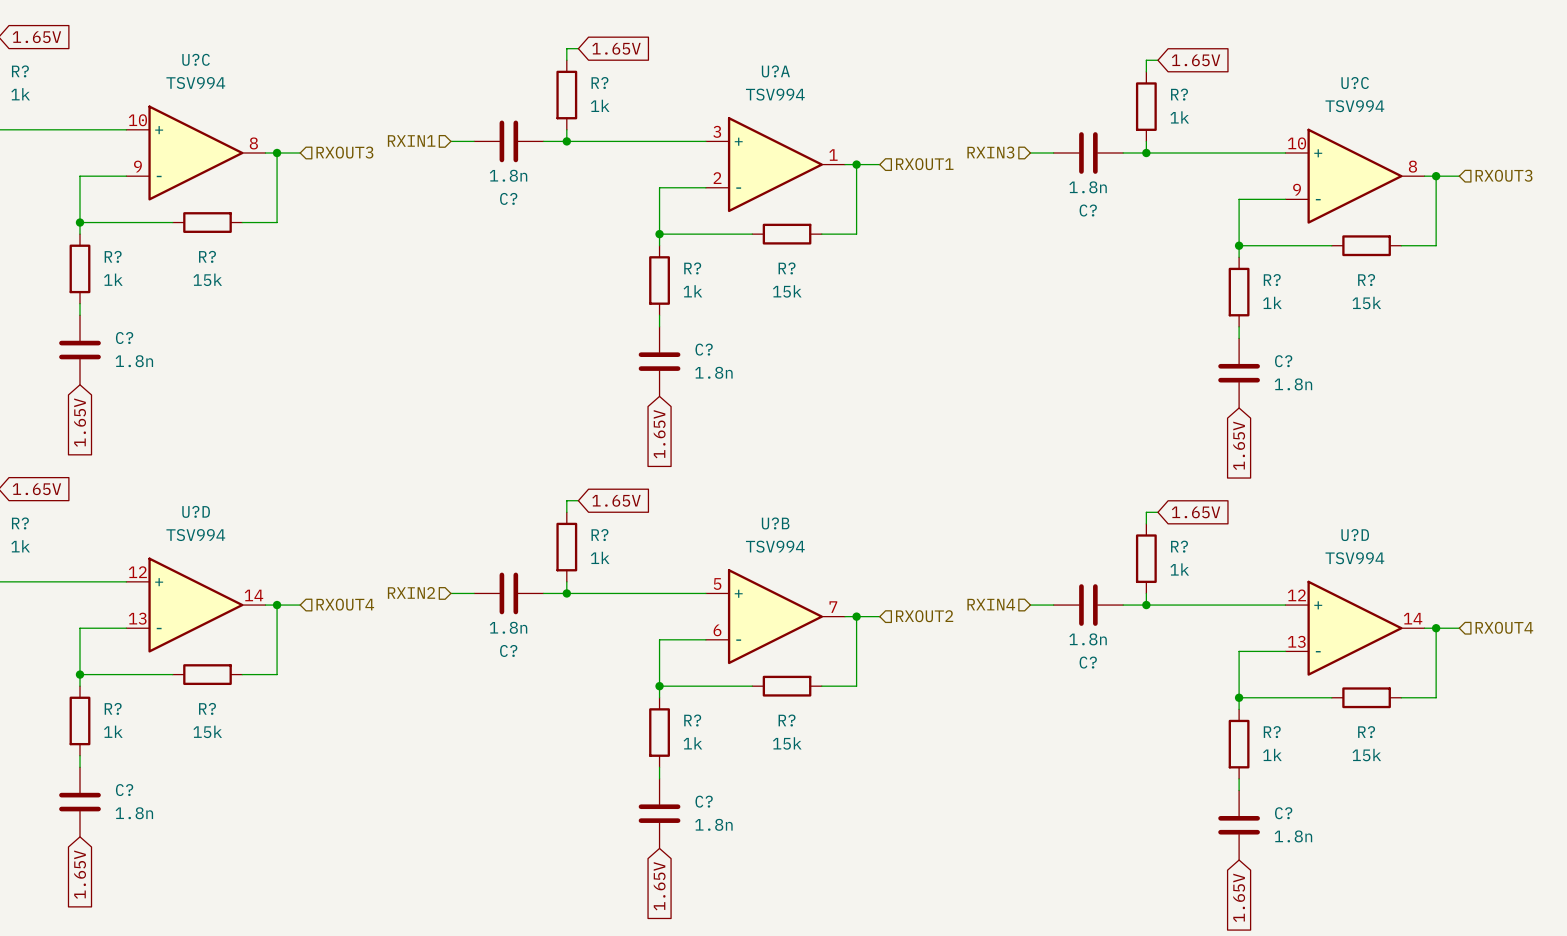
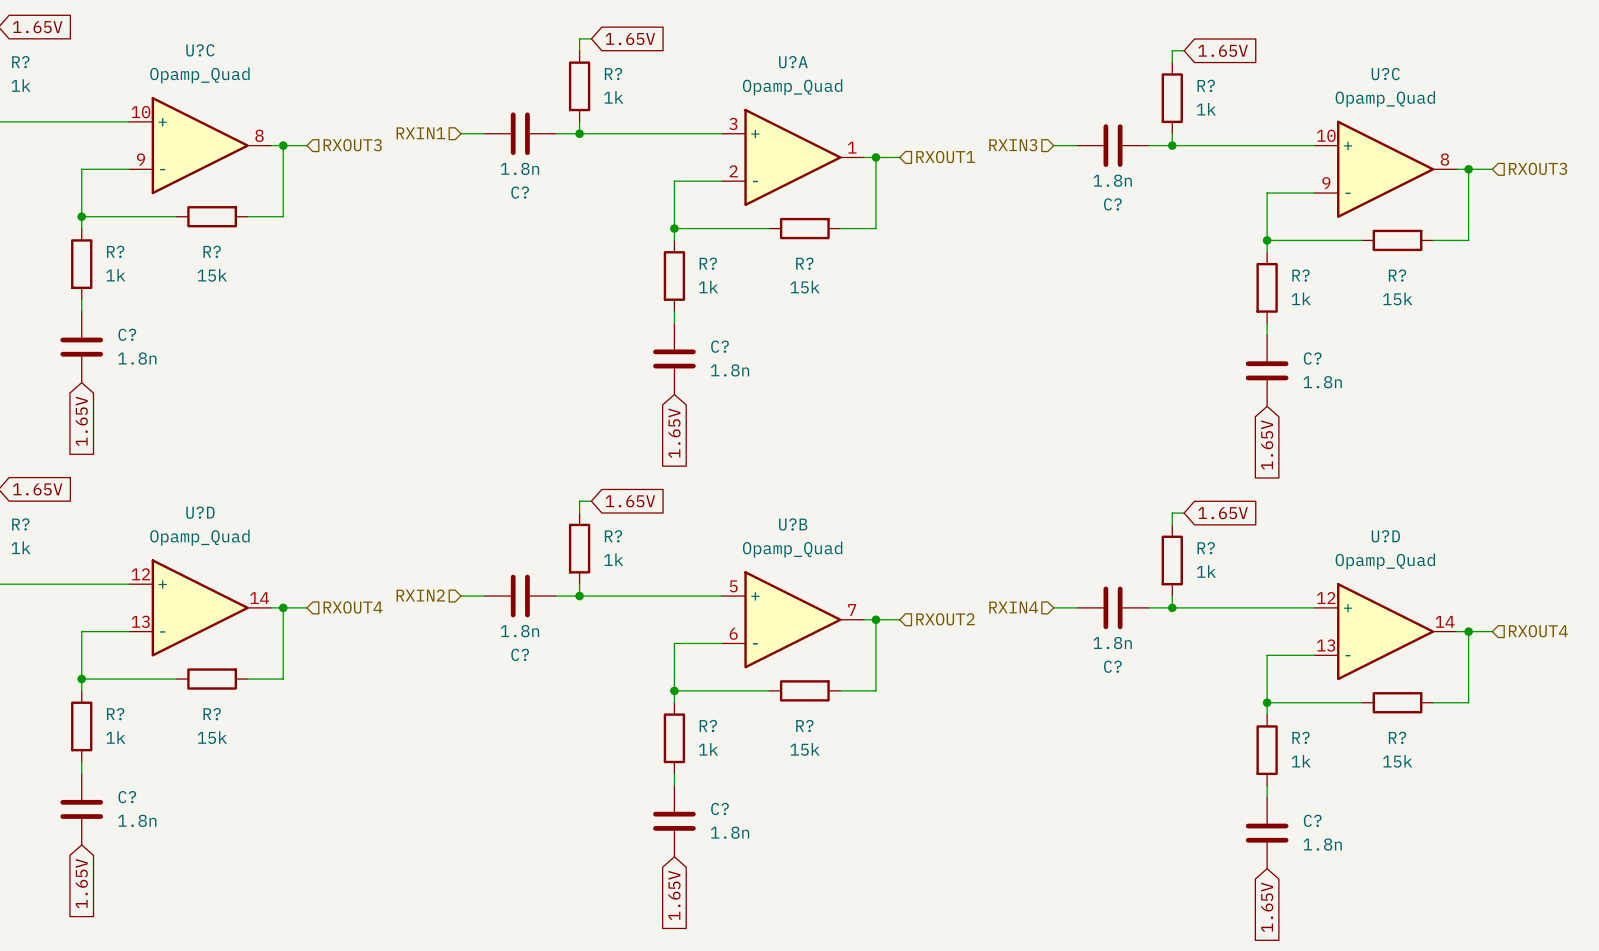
U?C value: TSV994 (195, 83) -> Opamp_Quad (199, 75)
U?A value: TSV994 (775, 94) -> Opamp_Quad (792, 87)
U?C value: TSV994 (1354, 106) -> Opamp_Quad (1385, 99)
U?D value: TSV994 (195, 535) -> Opamp_Quad (199, 537)
U?B value: TSV994 (775, 546) -> Opamp_Quad (792, 549)
U?D value: TSV994 (1354, 558) -> Opamp_Quad (1385, 561)

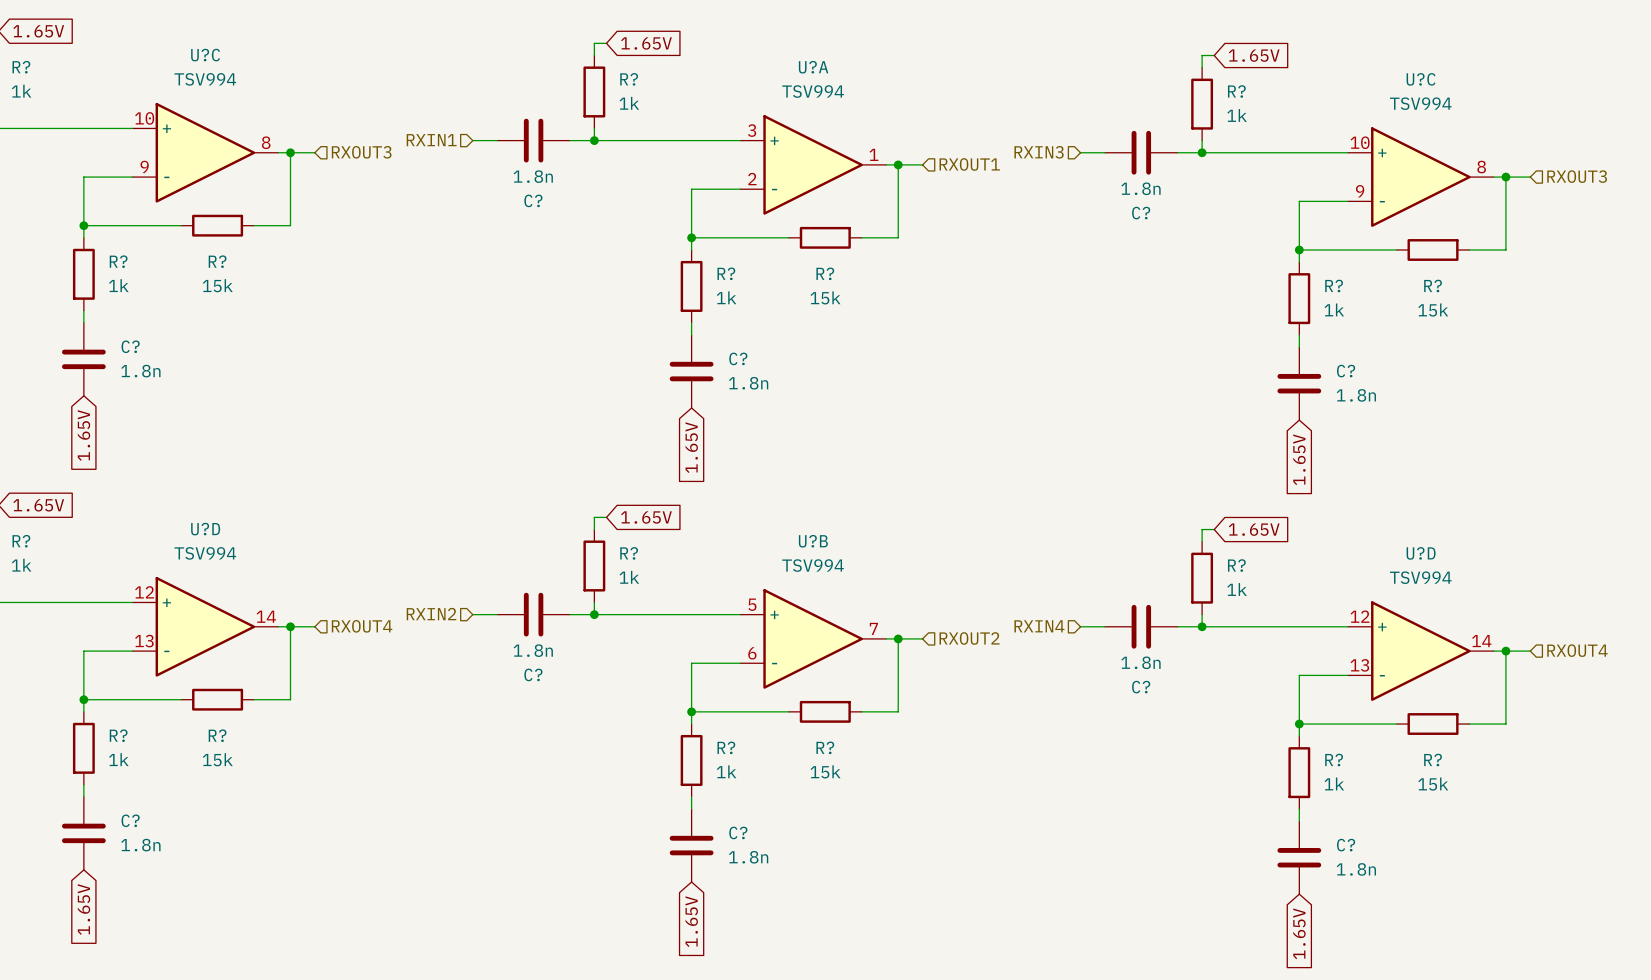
U?C value: Opamp_Quad (199, 75) -> TSV994 (205, 79)
U?A value: Opamp_Quad (792, 87) -> TSV994 (813, 91)
U?C value: Opamp_Quad (1385, 99) -> TSV994 (1420, 103)
U?D value: Opamp_Quad (199, 537) -> TSV994 (205, 553)
U?B value: Opamp_Quad (792, 549) -> TSV994 (813, 565)
U?D value: Opamp_Quad (1385, 561) -> TSV994 (1420, 577)

